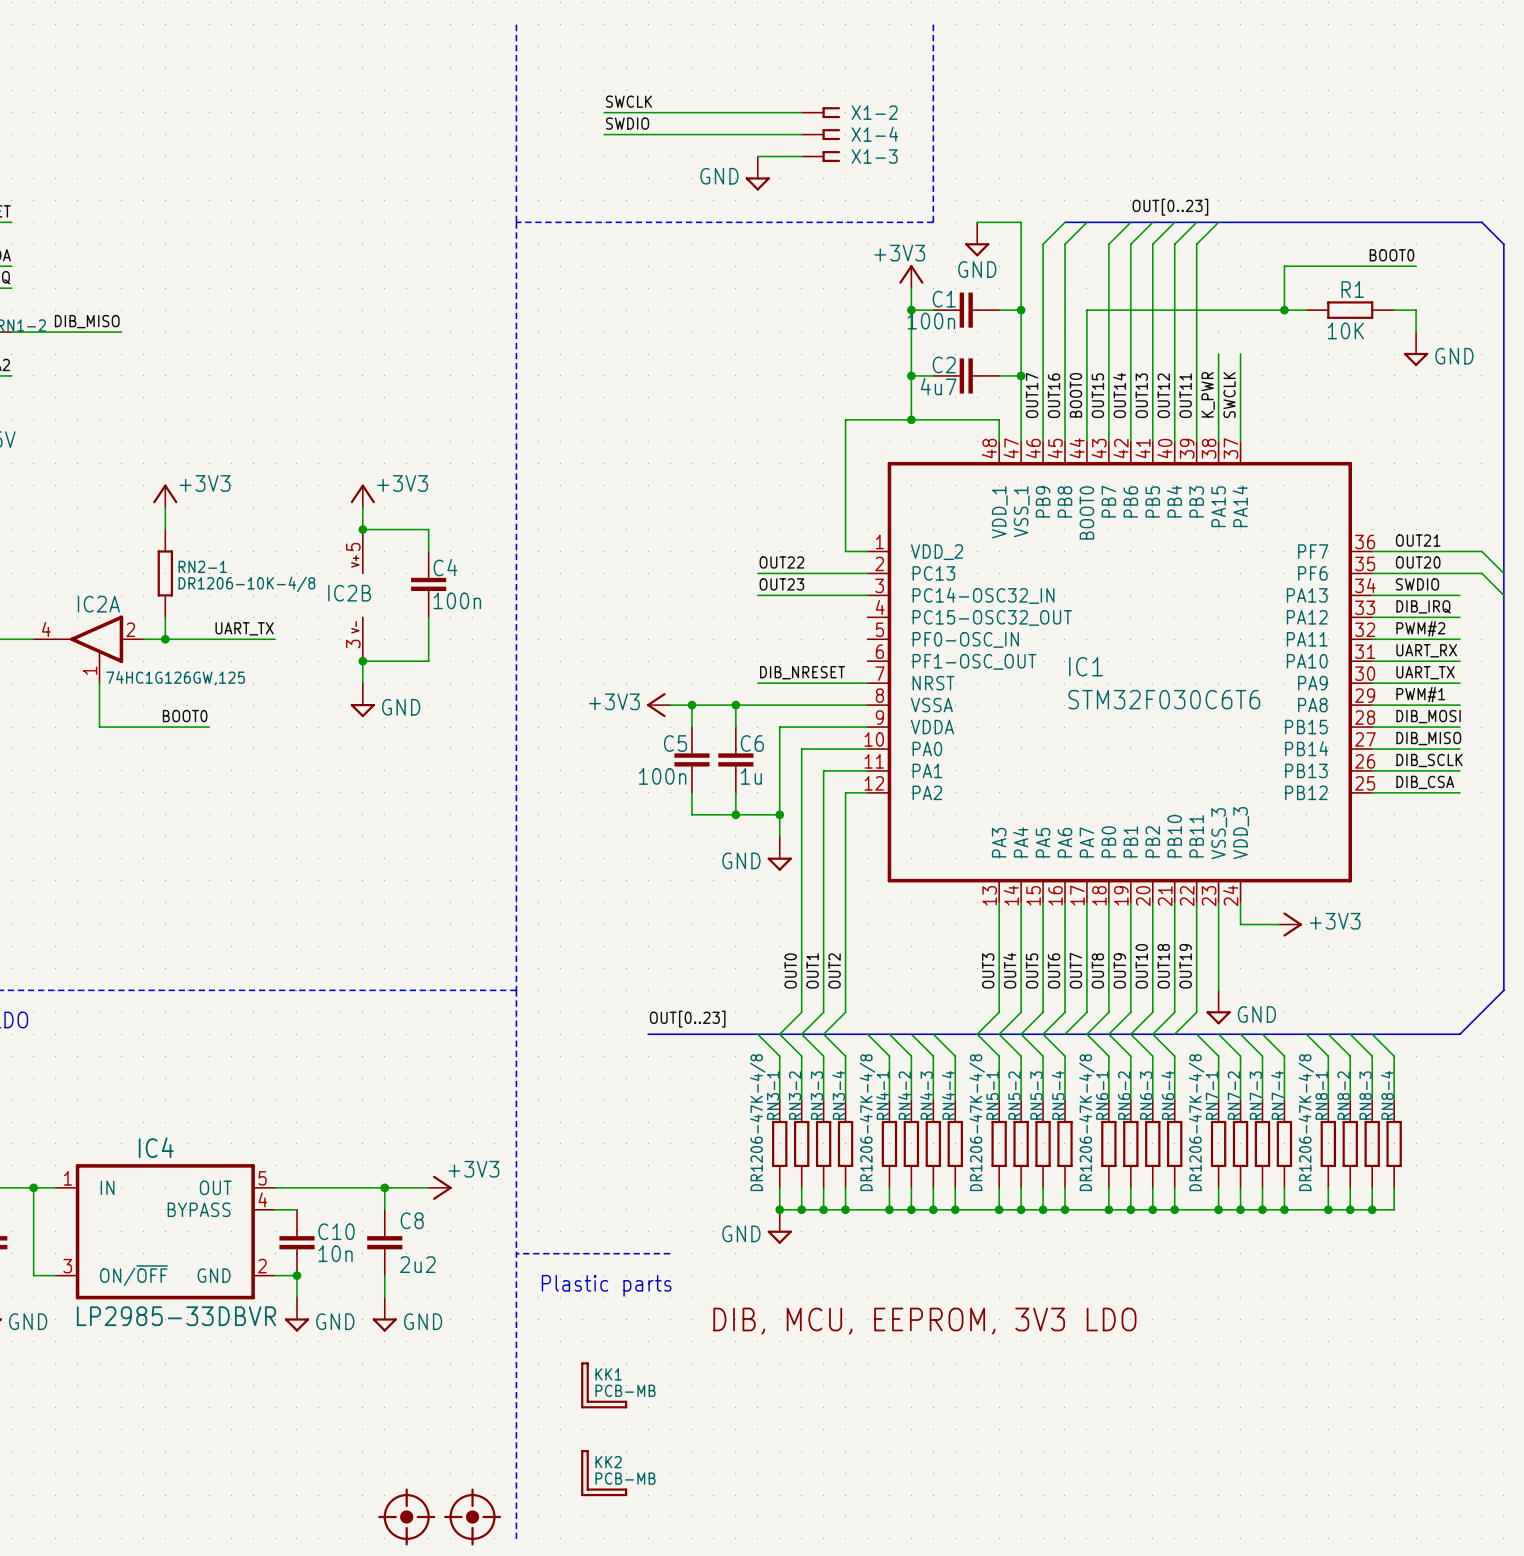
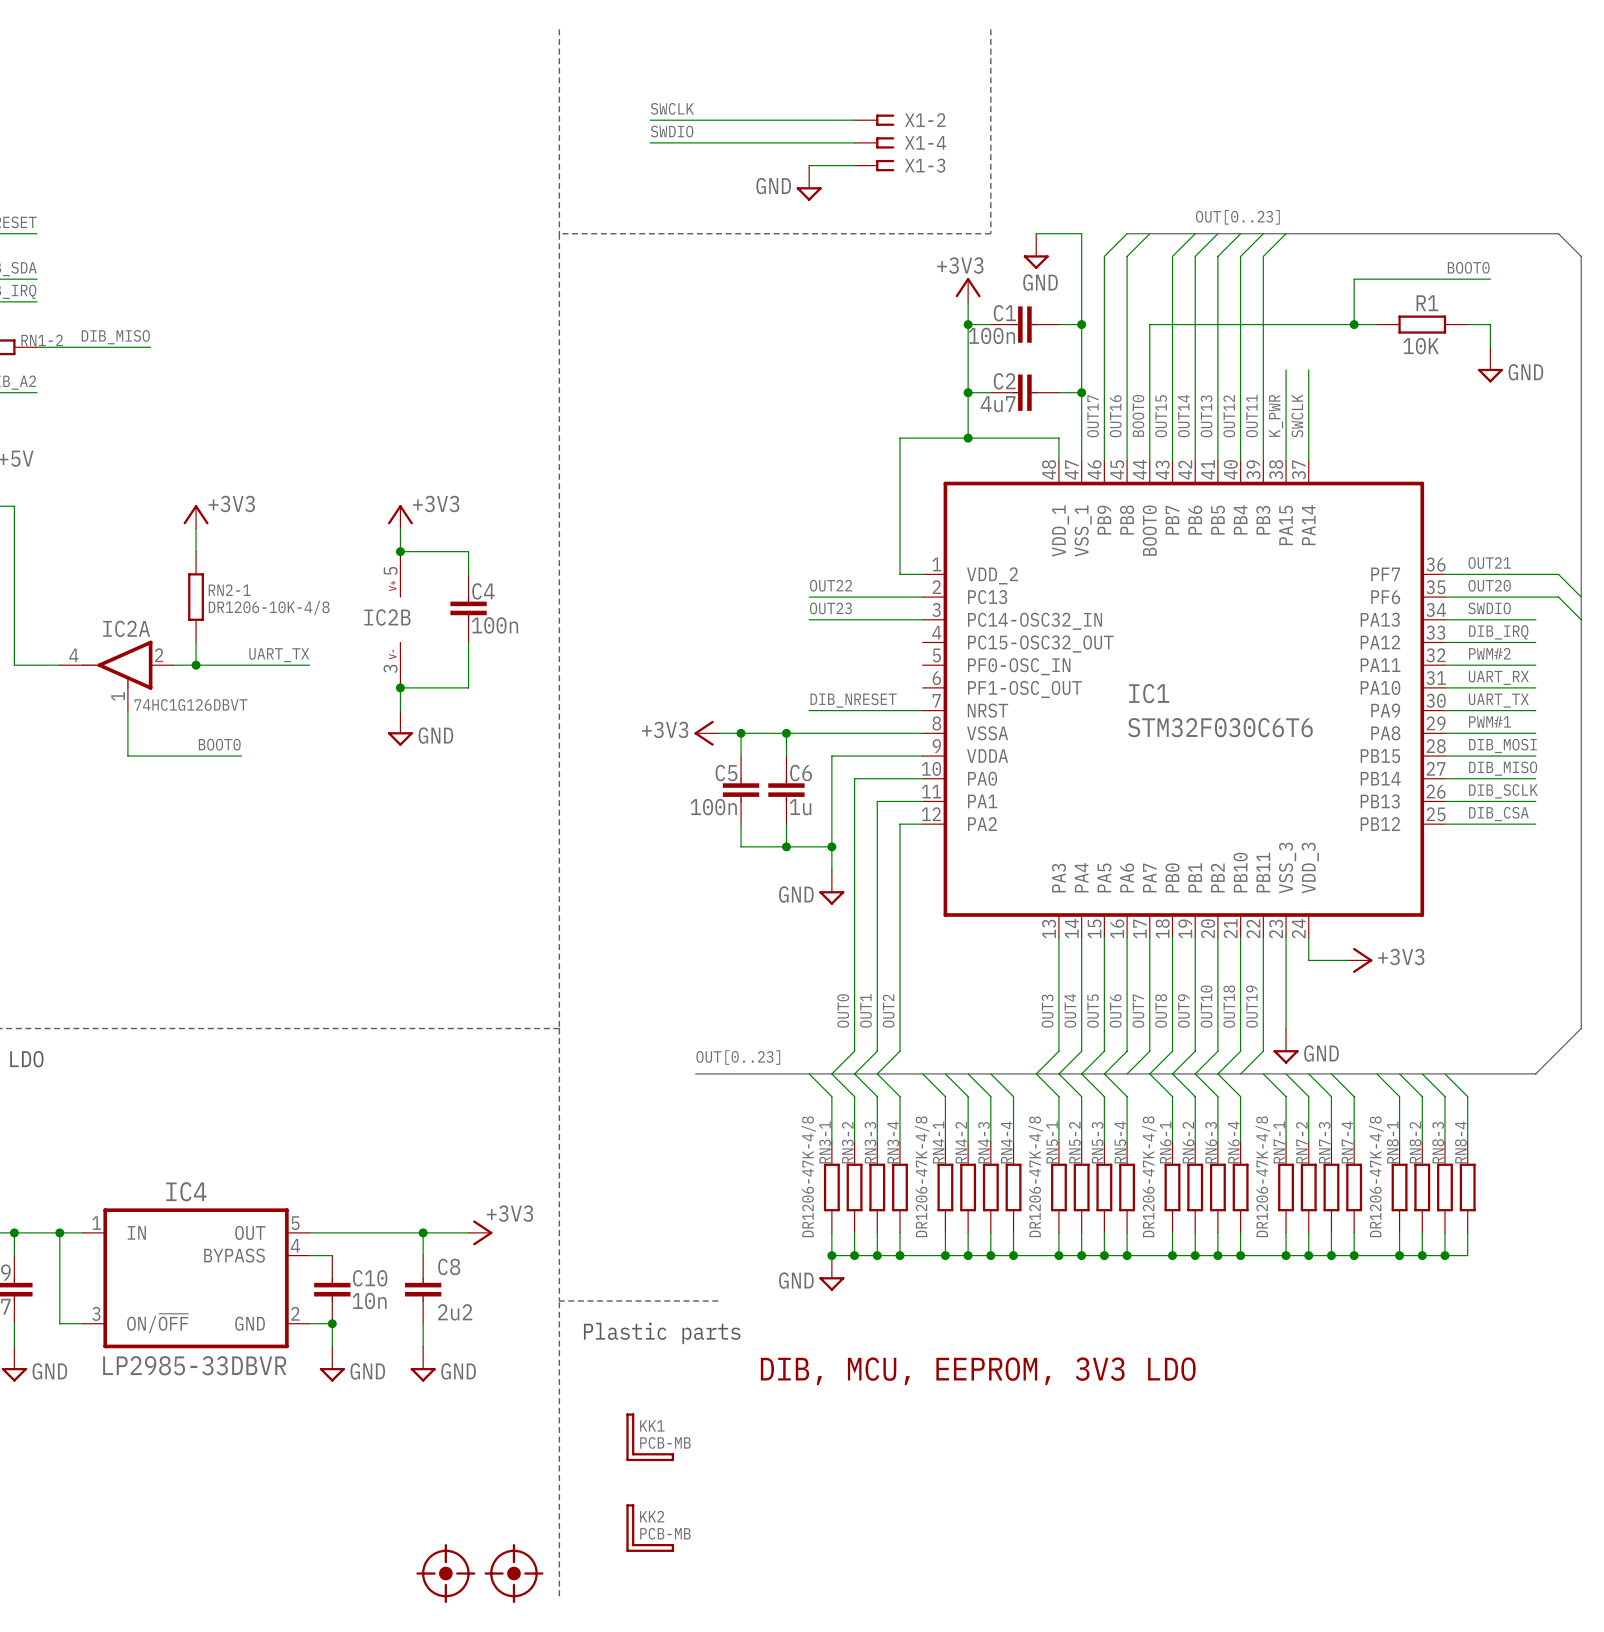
IC2A value: 74HC1G126GW,125 (175, 678) -> 74HC1G126DBVT (190, 704)

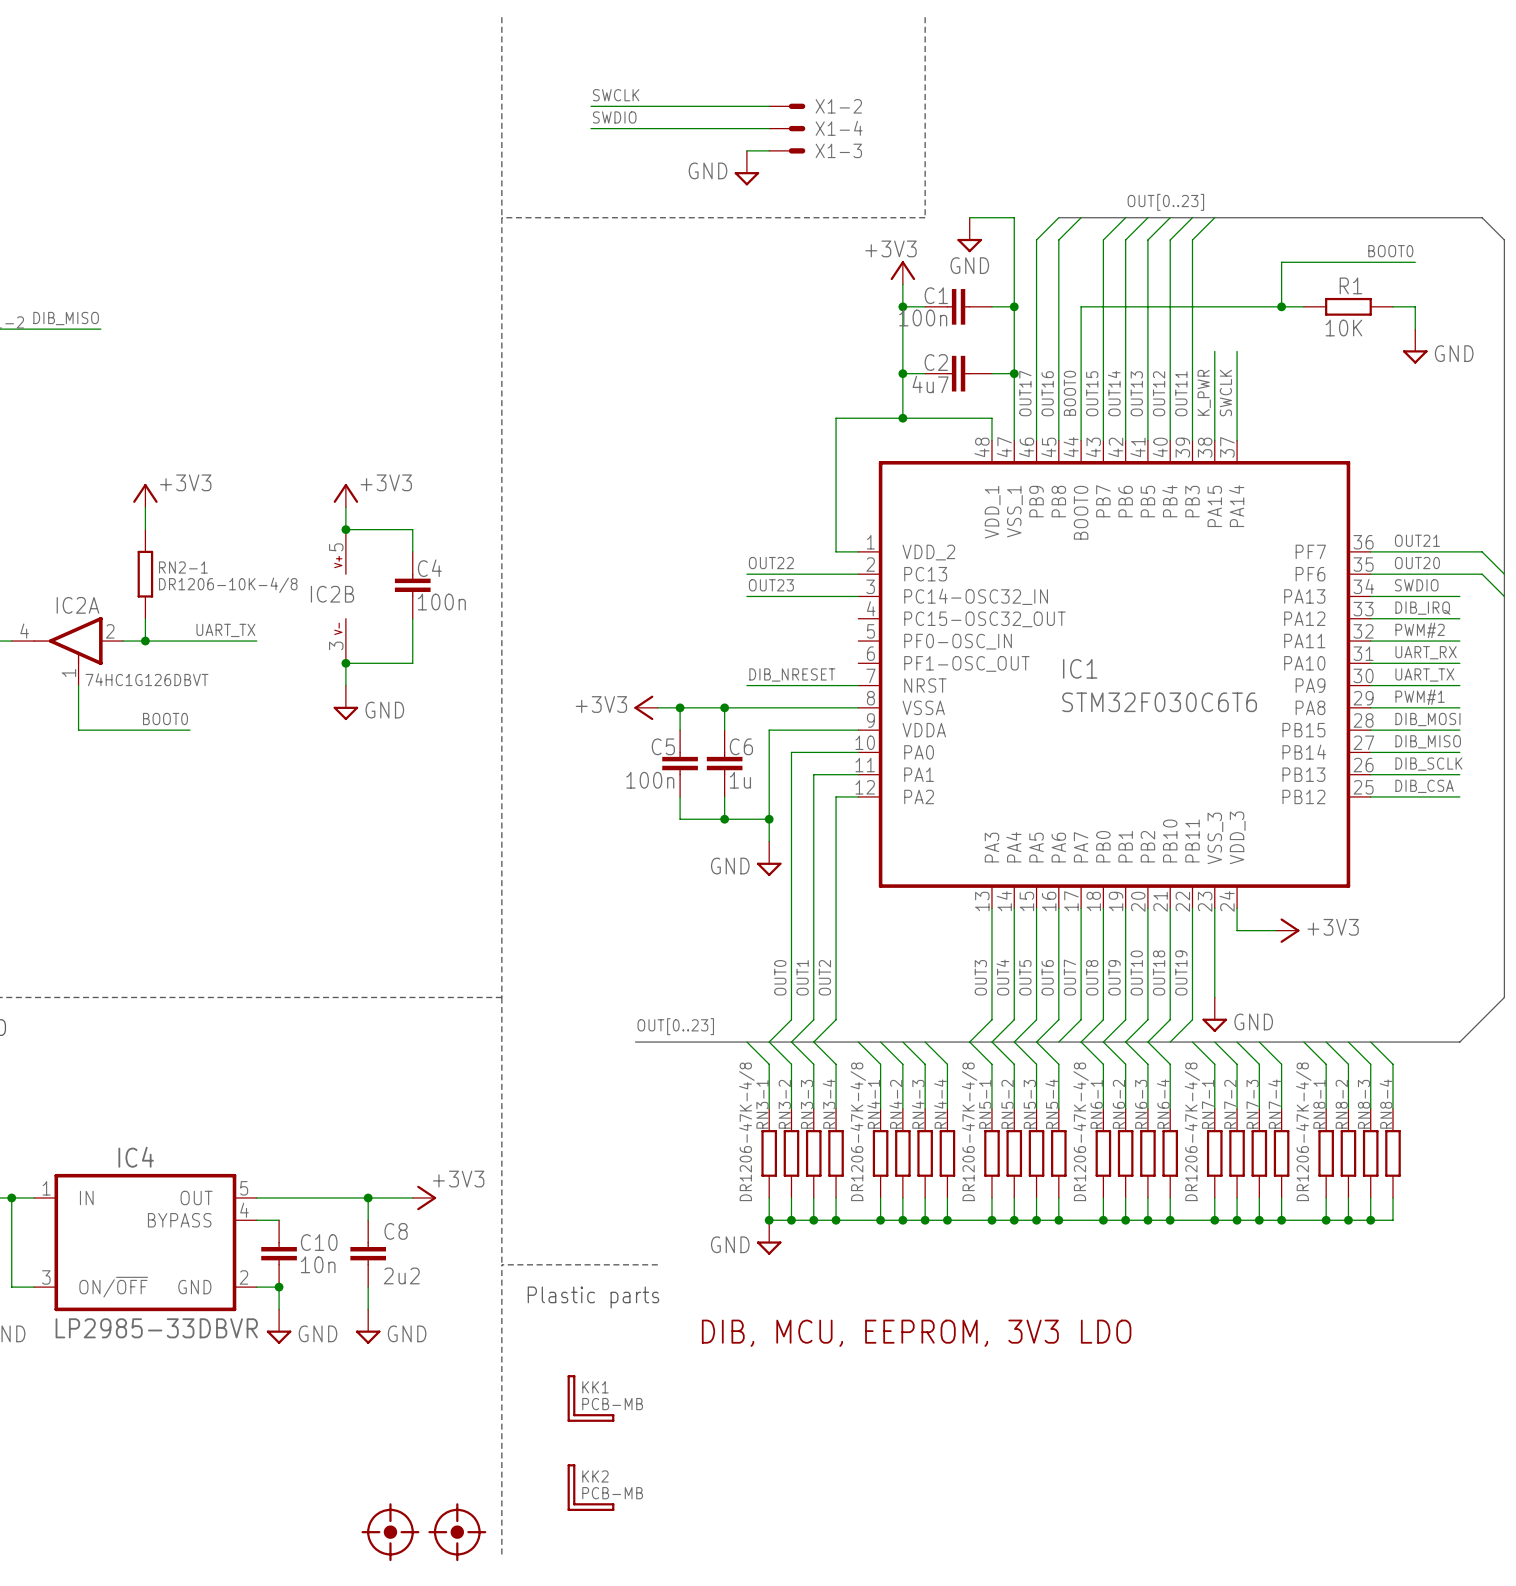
X1-2 symbol: [854, 114, 895, 126] -> [769, 103, 806, 110]
X1-4 symbol: [854, 137, 895, 149] -> [769, 125, 806, 132]
X1-3 symbol: [854, 159, 895, 172] -> [769, 148, 806, 154]

